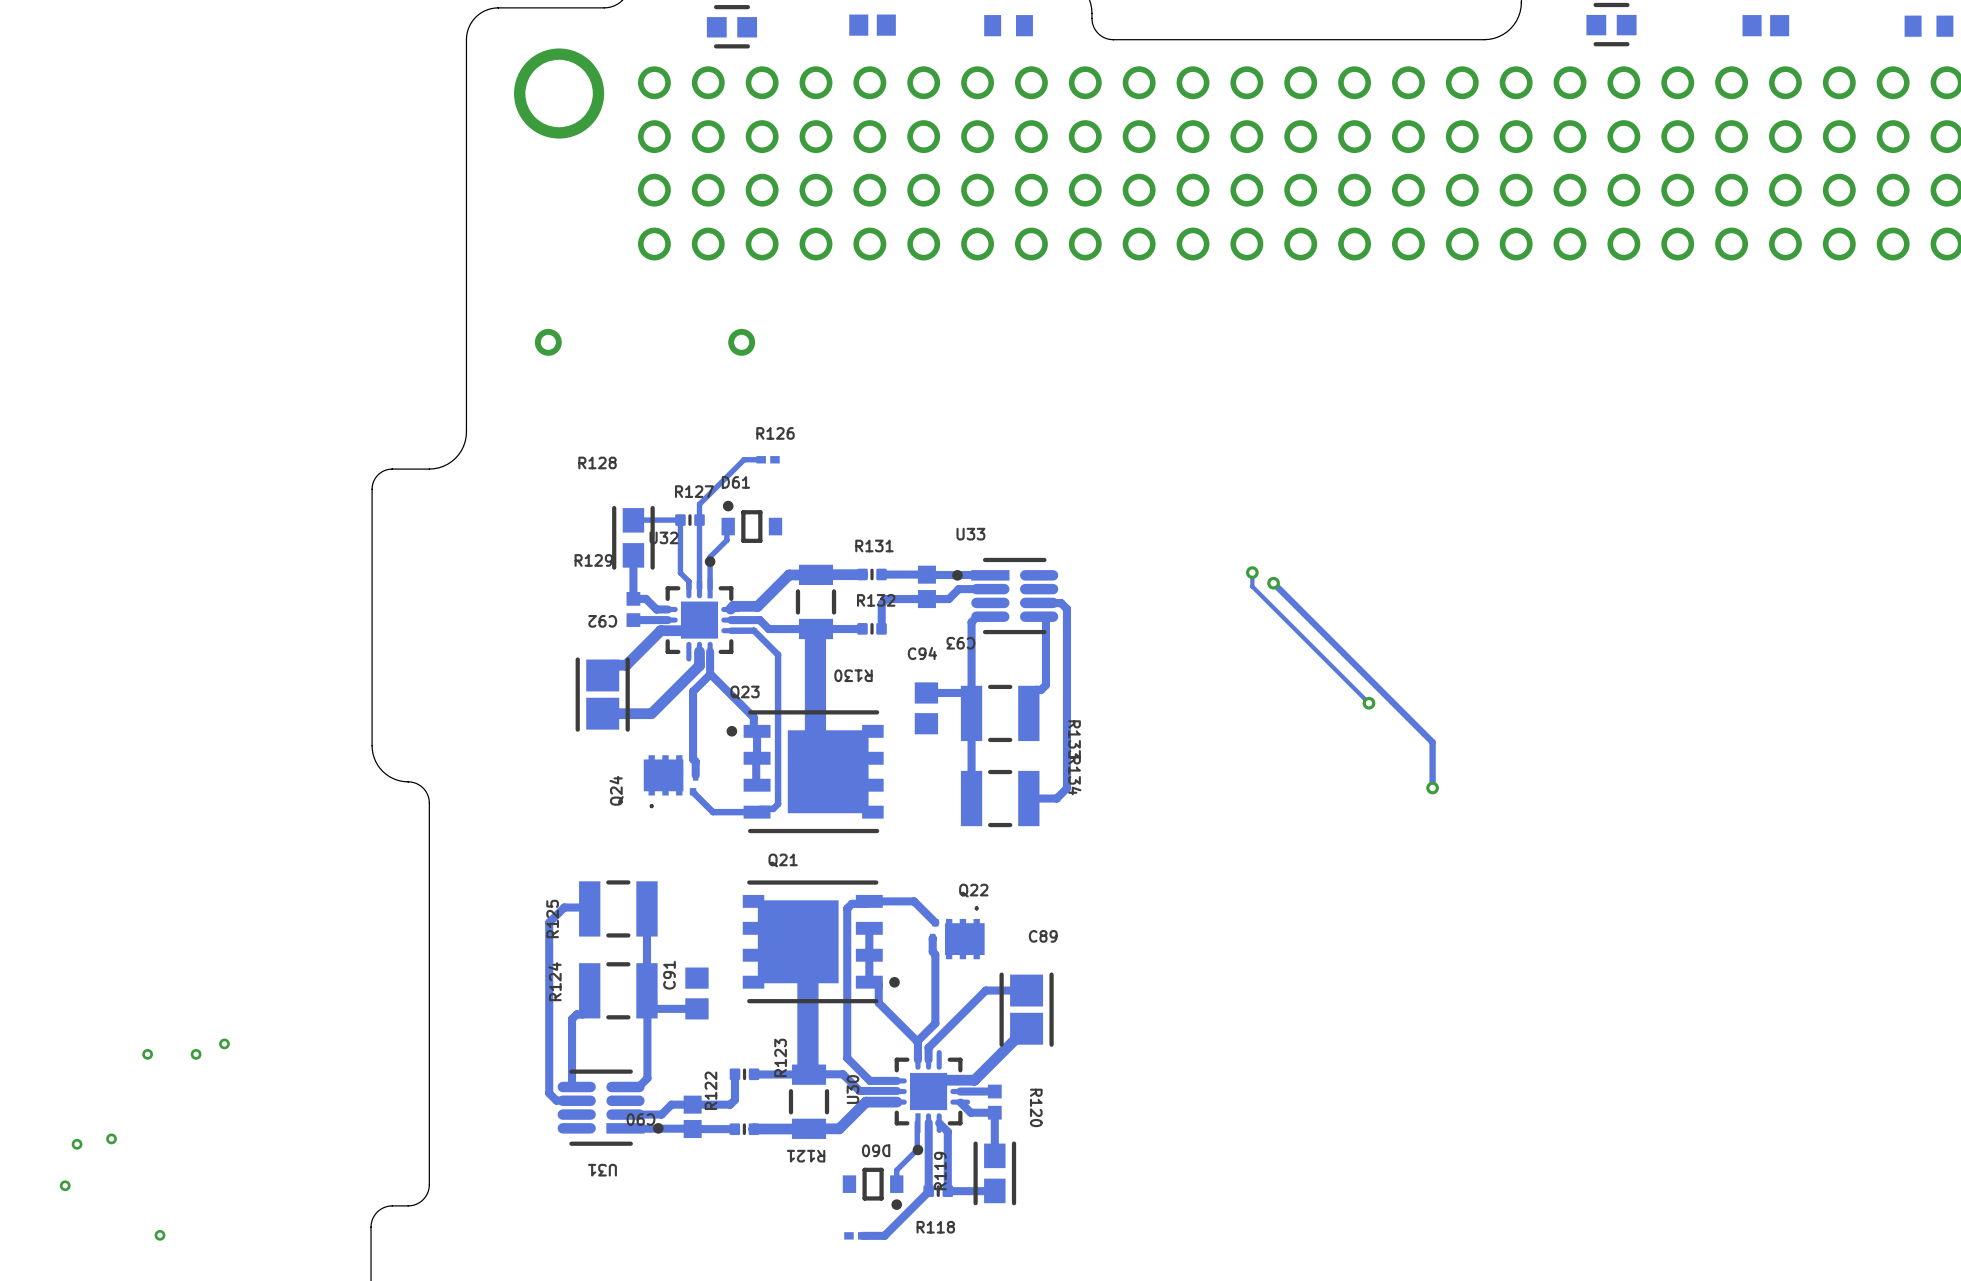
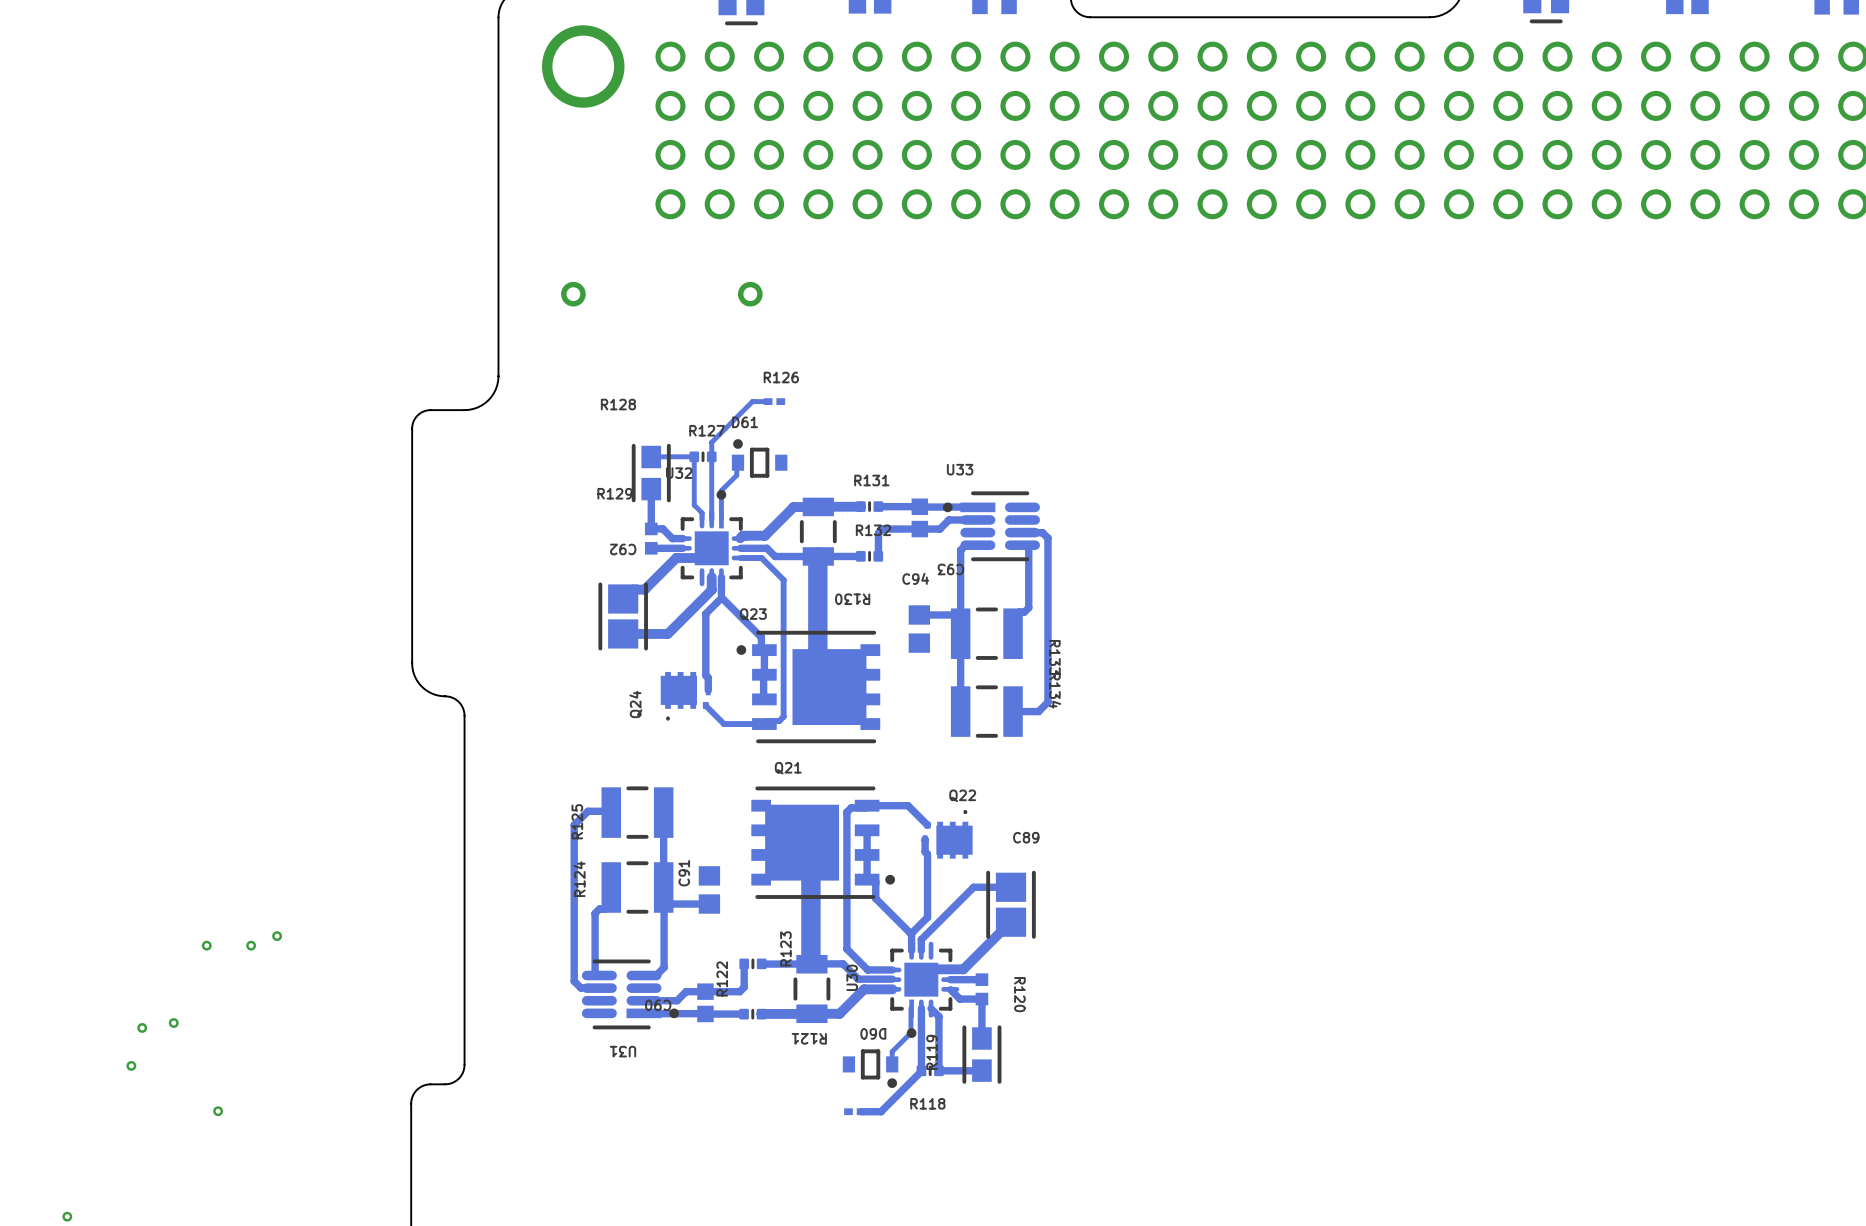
track: (1252, 572) (1252, 586) (1368, 703) -> none
via: (1252, 572) -> none
track: (1273, 583) (1432, 742) (1432, 788) -> none
via: (1273, 583) -> none
via: (1368, 703) -> none
via: (1432, 788) -> none

